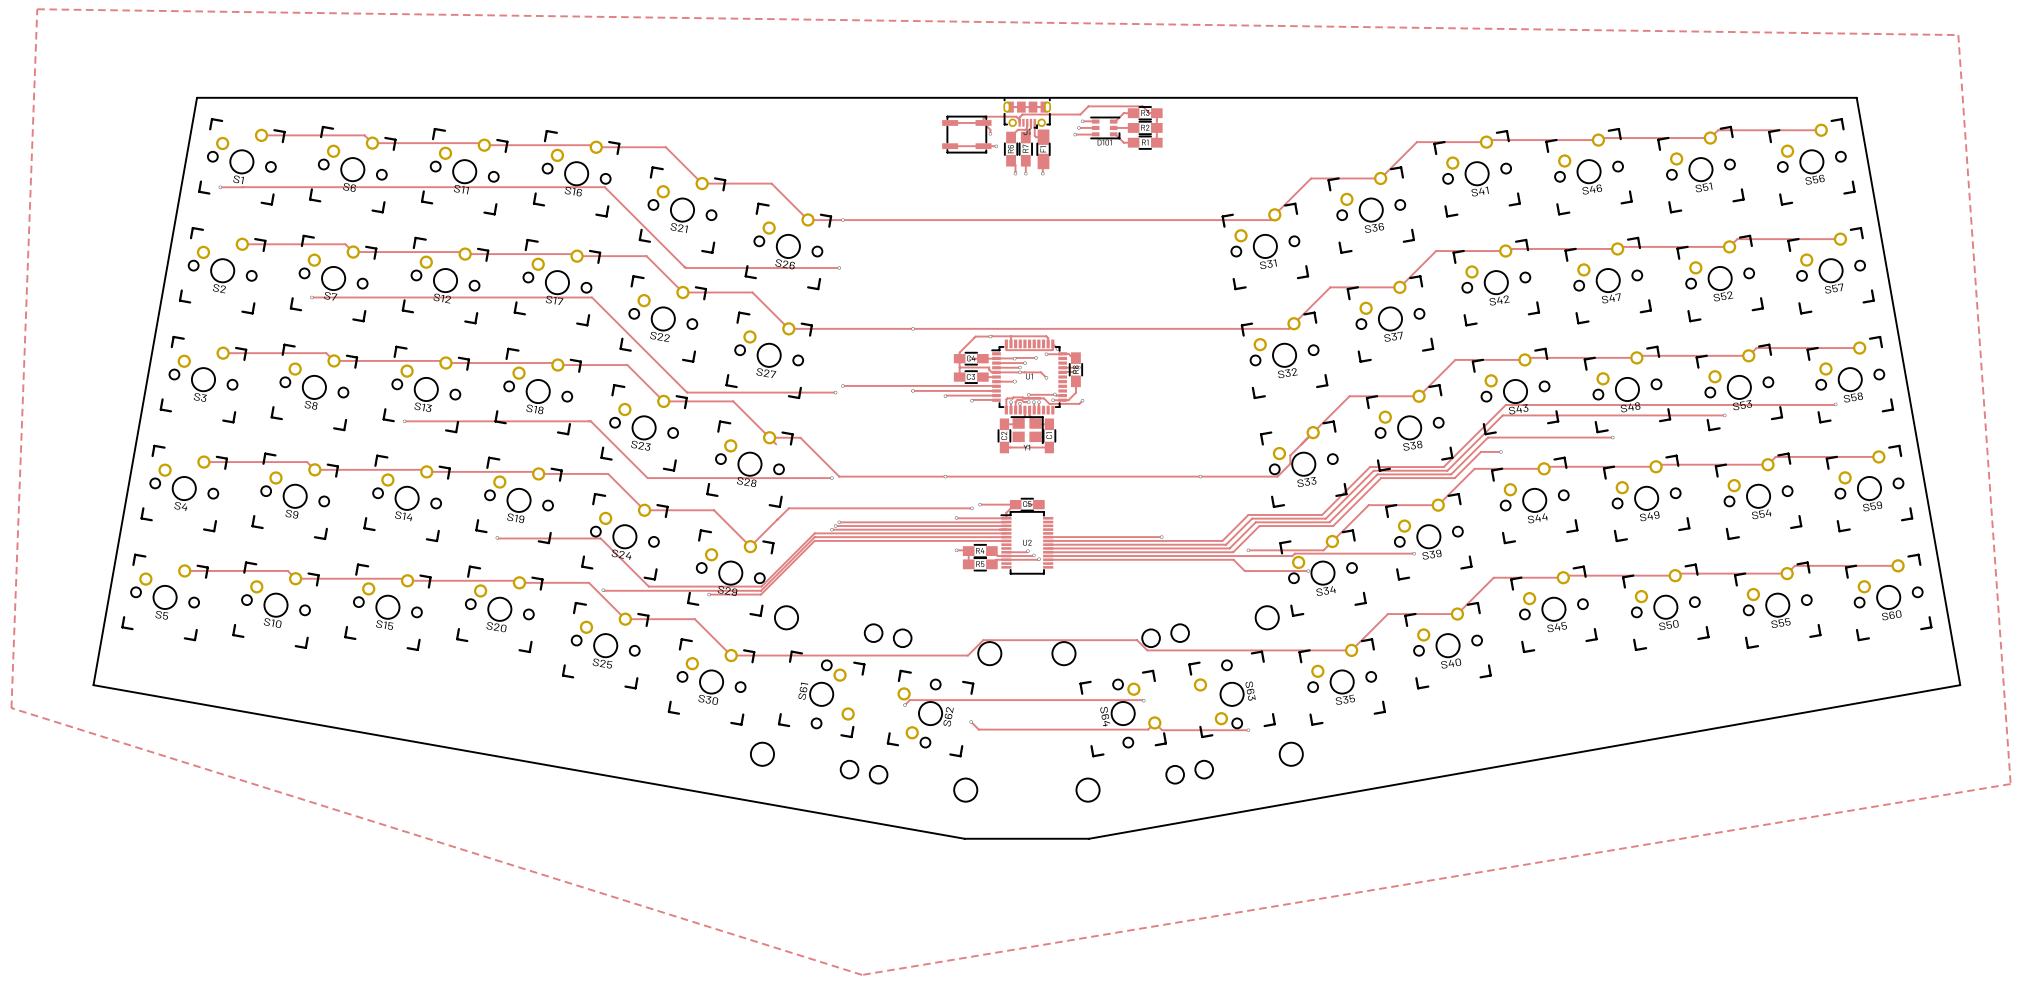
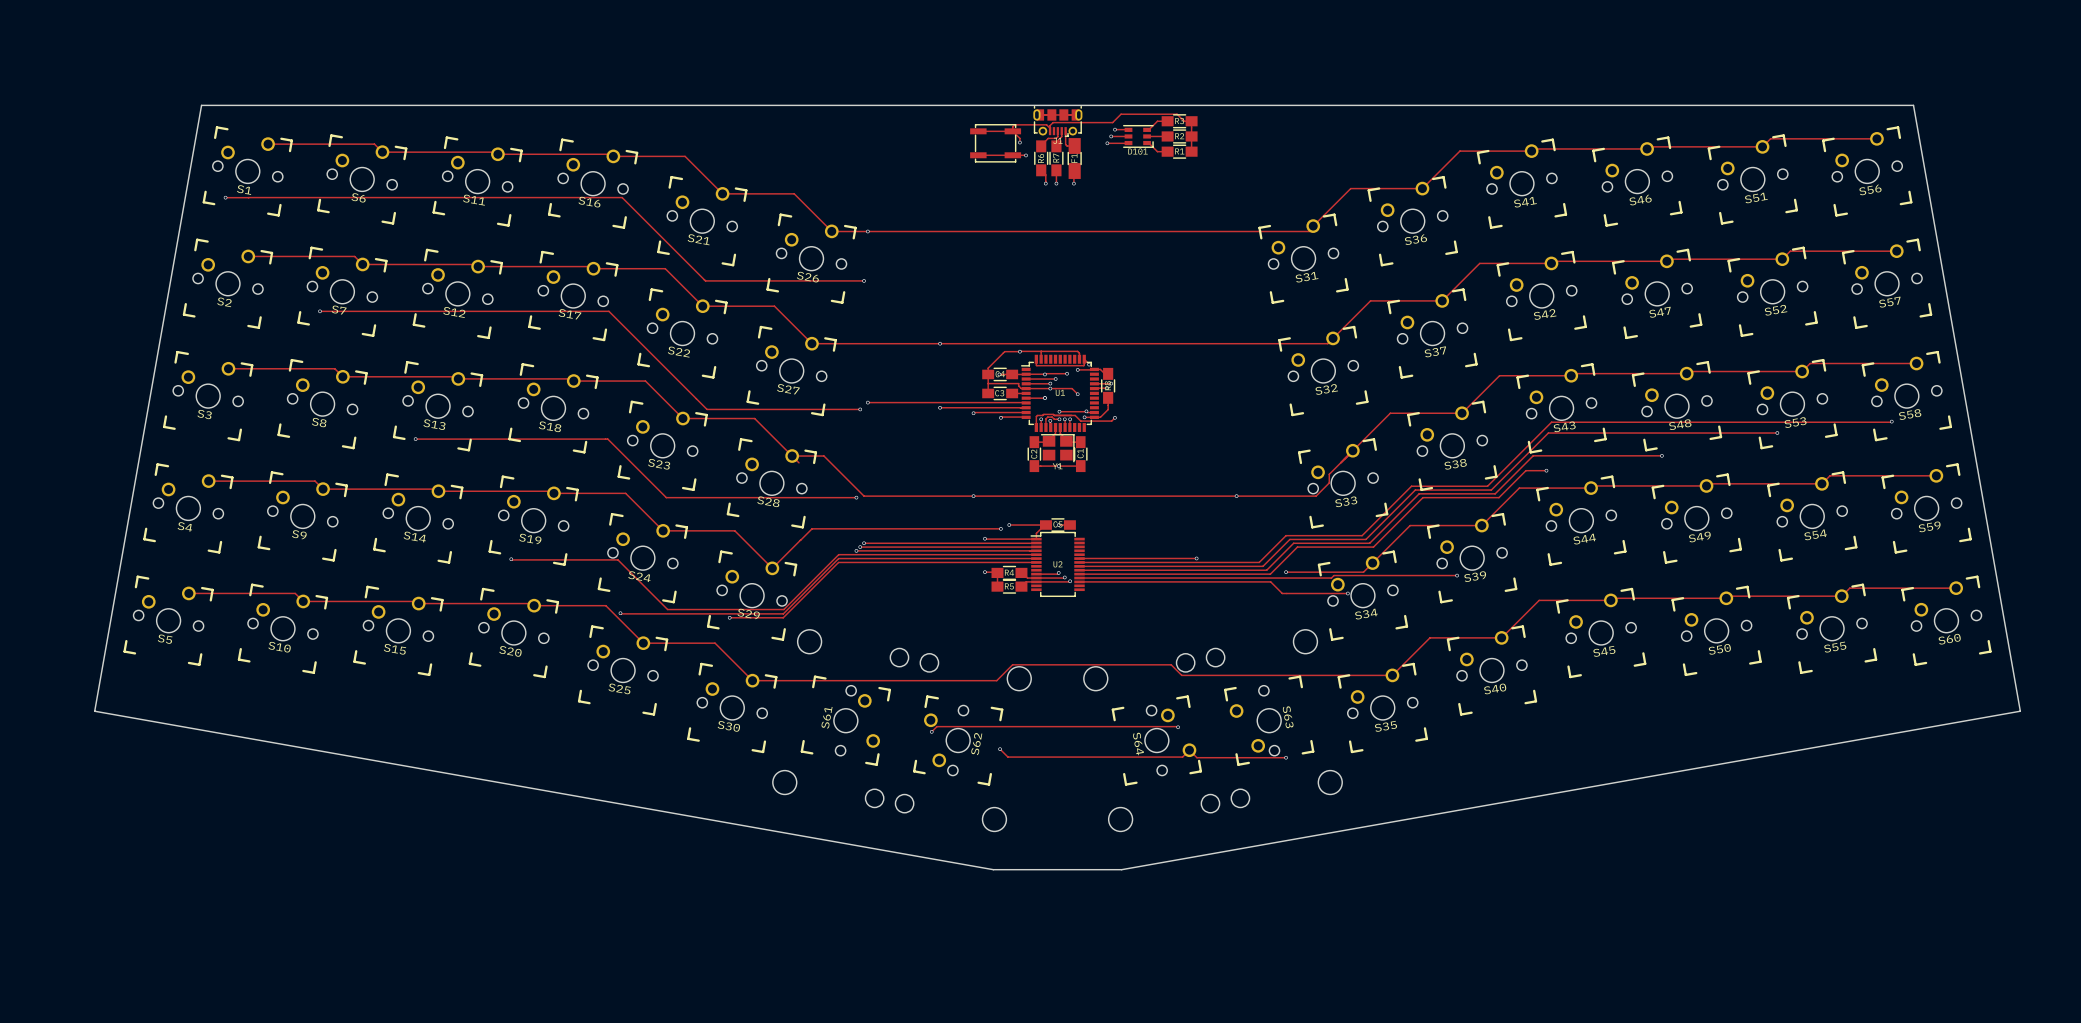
zone outline: (37, 9) (1958, 35) (2010, 784) (862, 974) (11, 708) (37, 9) -> none

